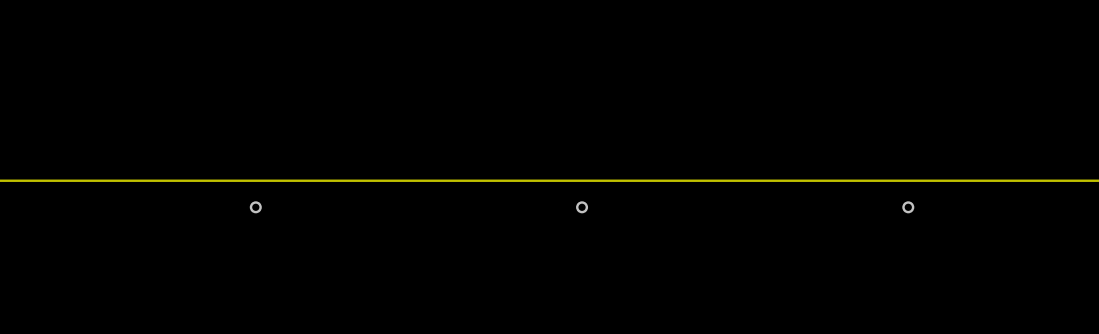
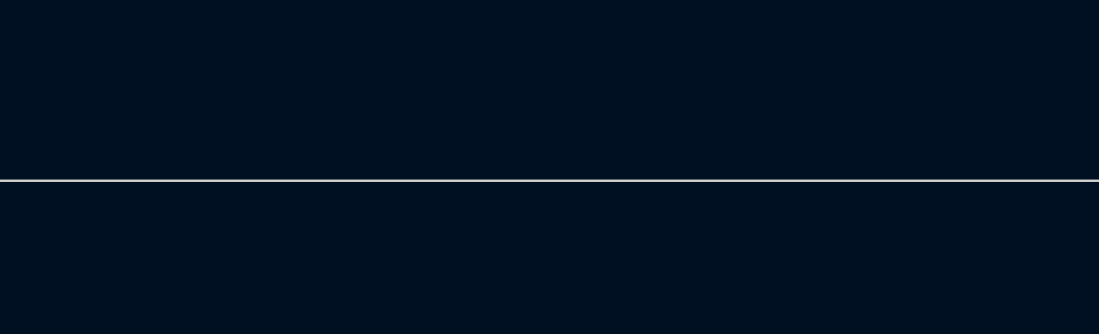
via: (255, 207) -> none
via: (582, 207) -> none
via: (908, 207) -> none

